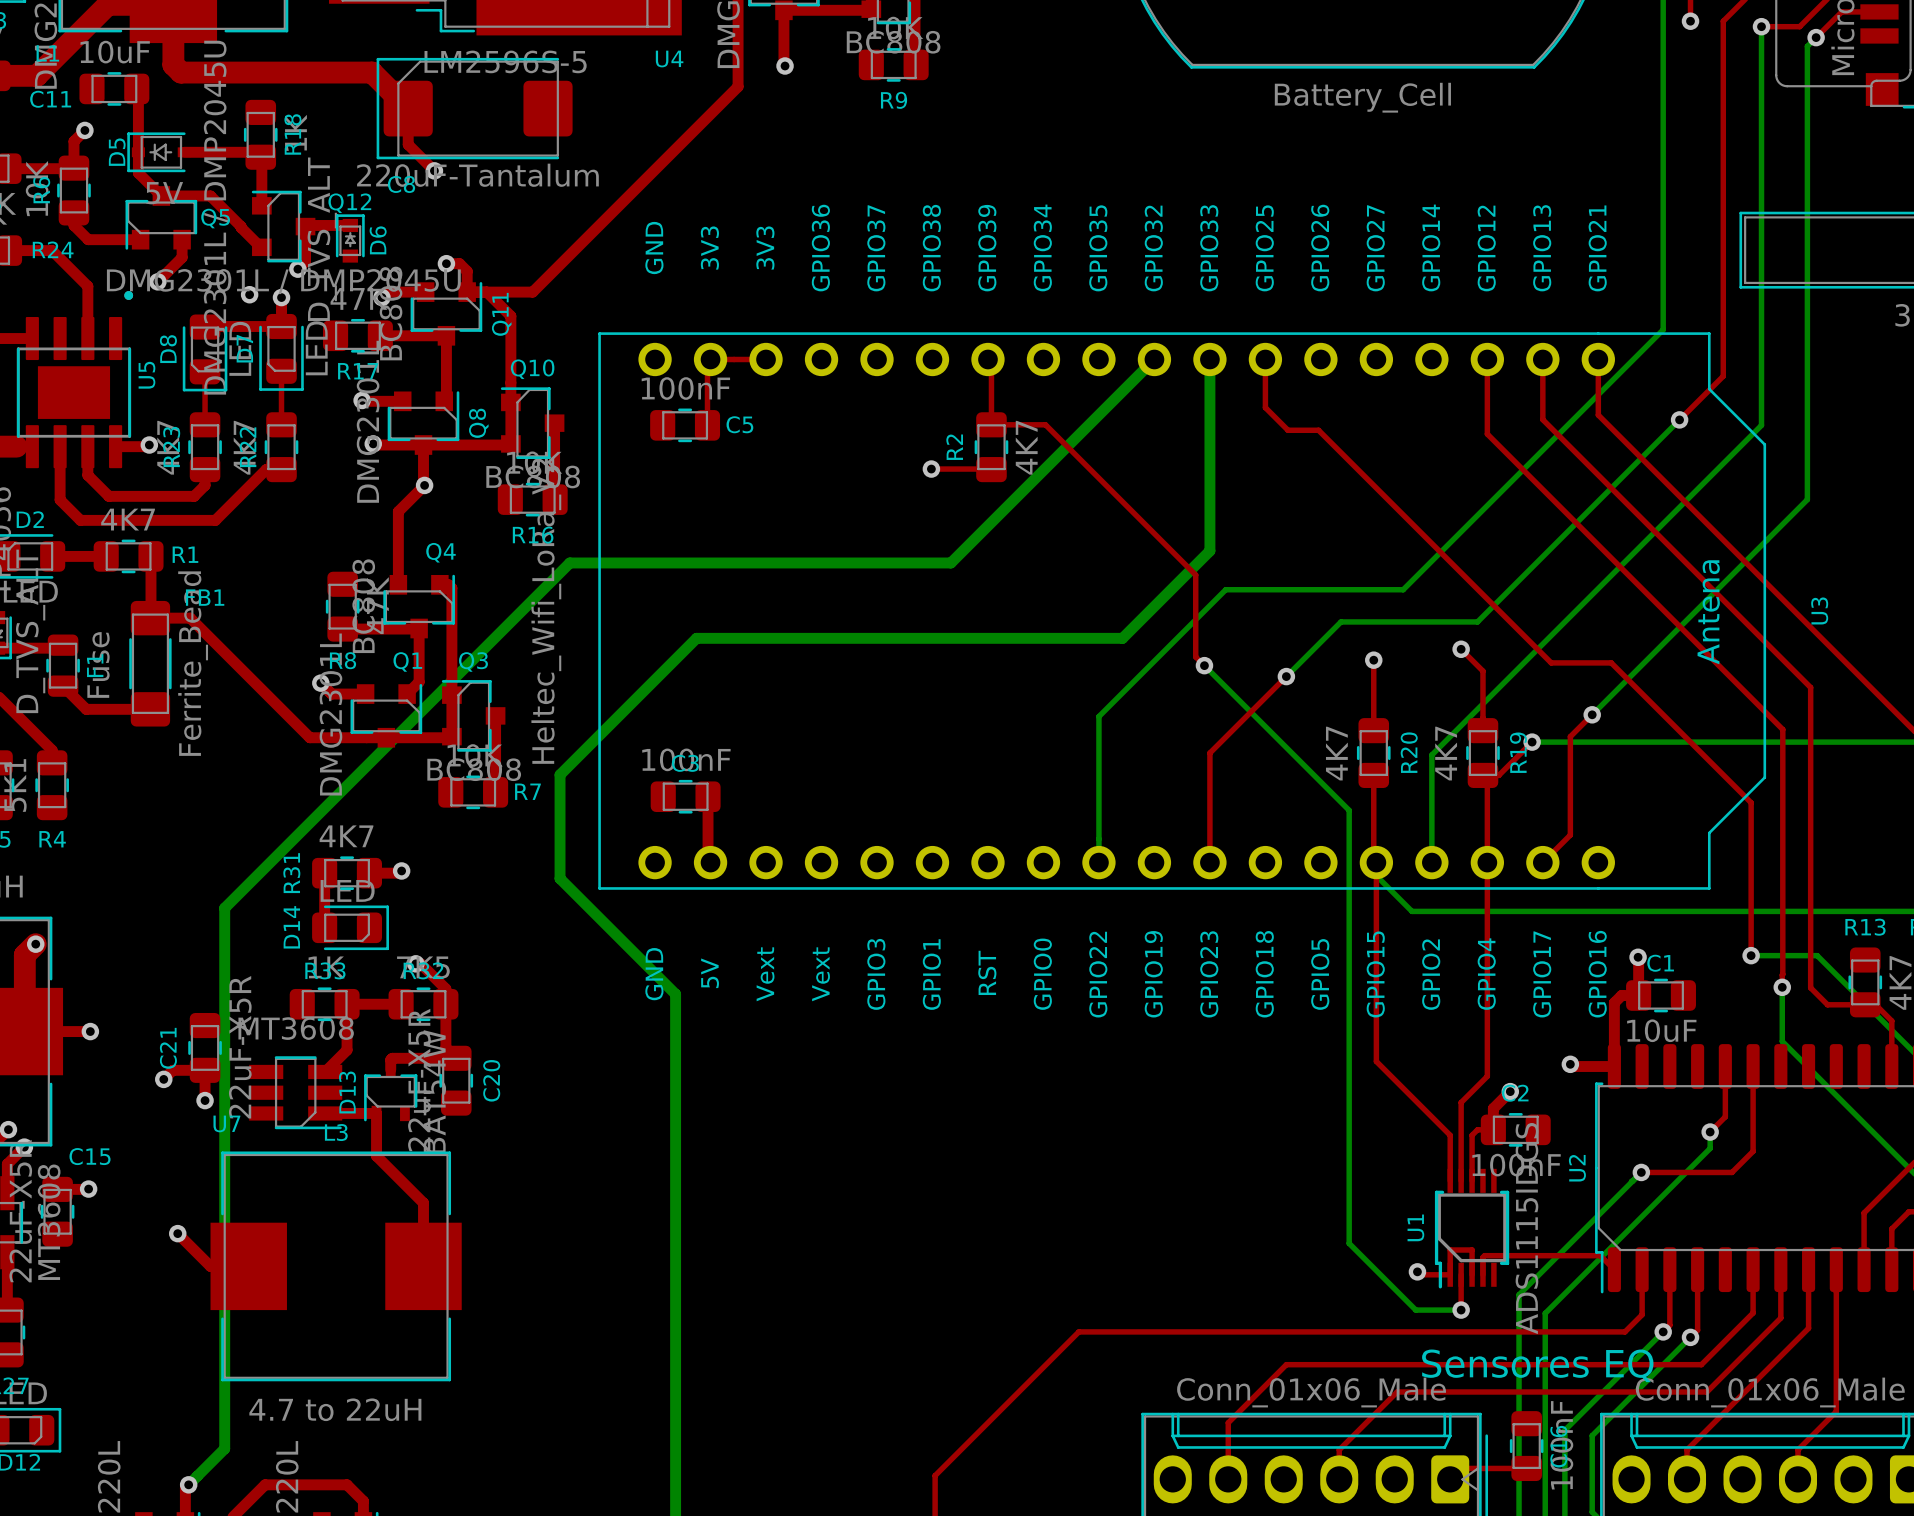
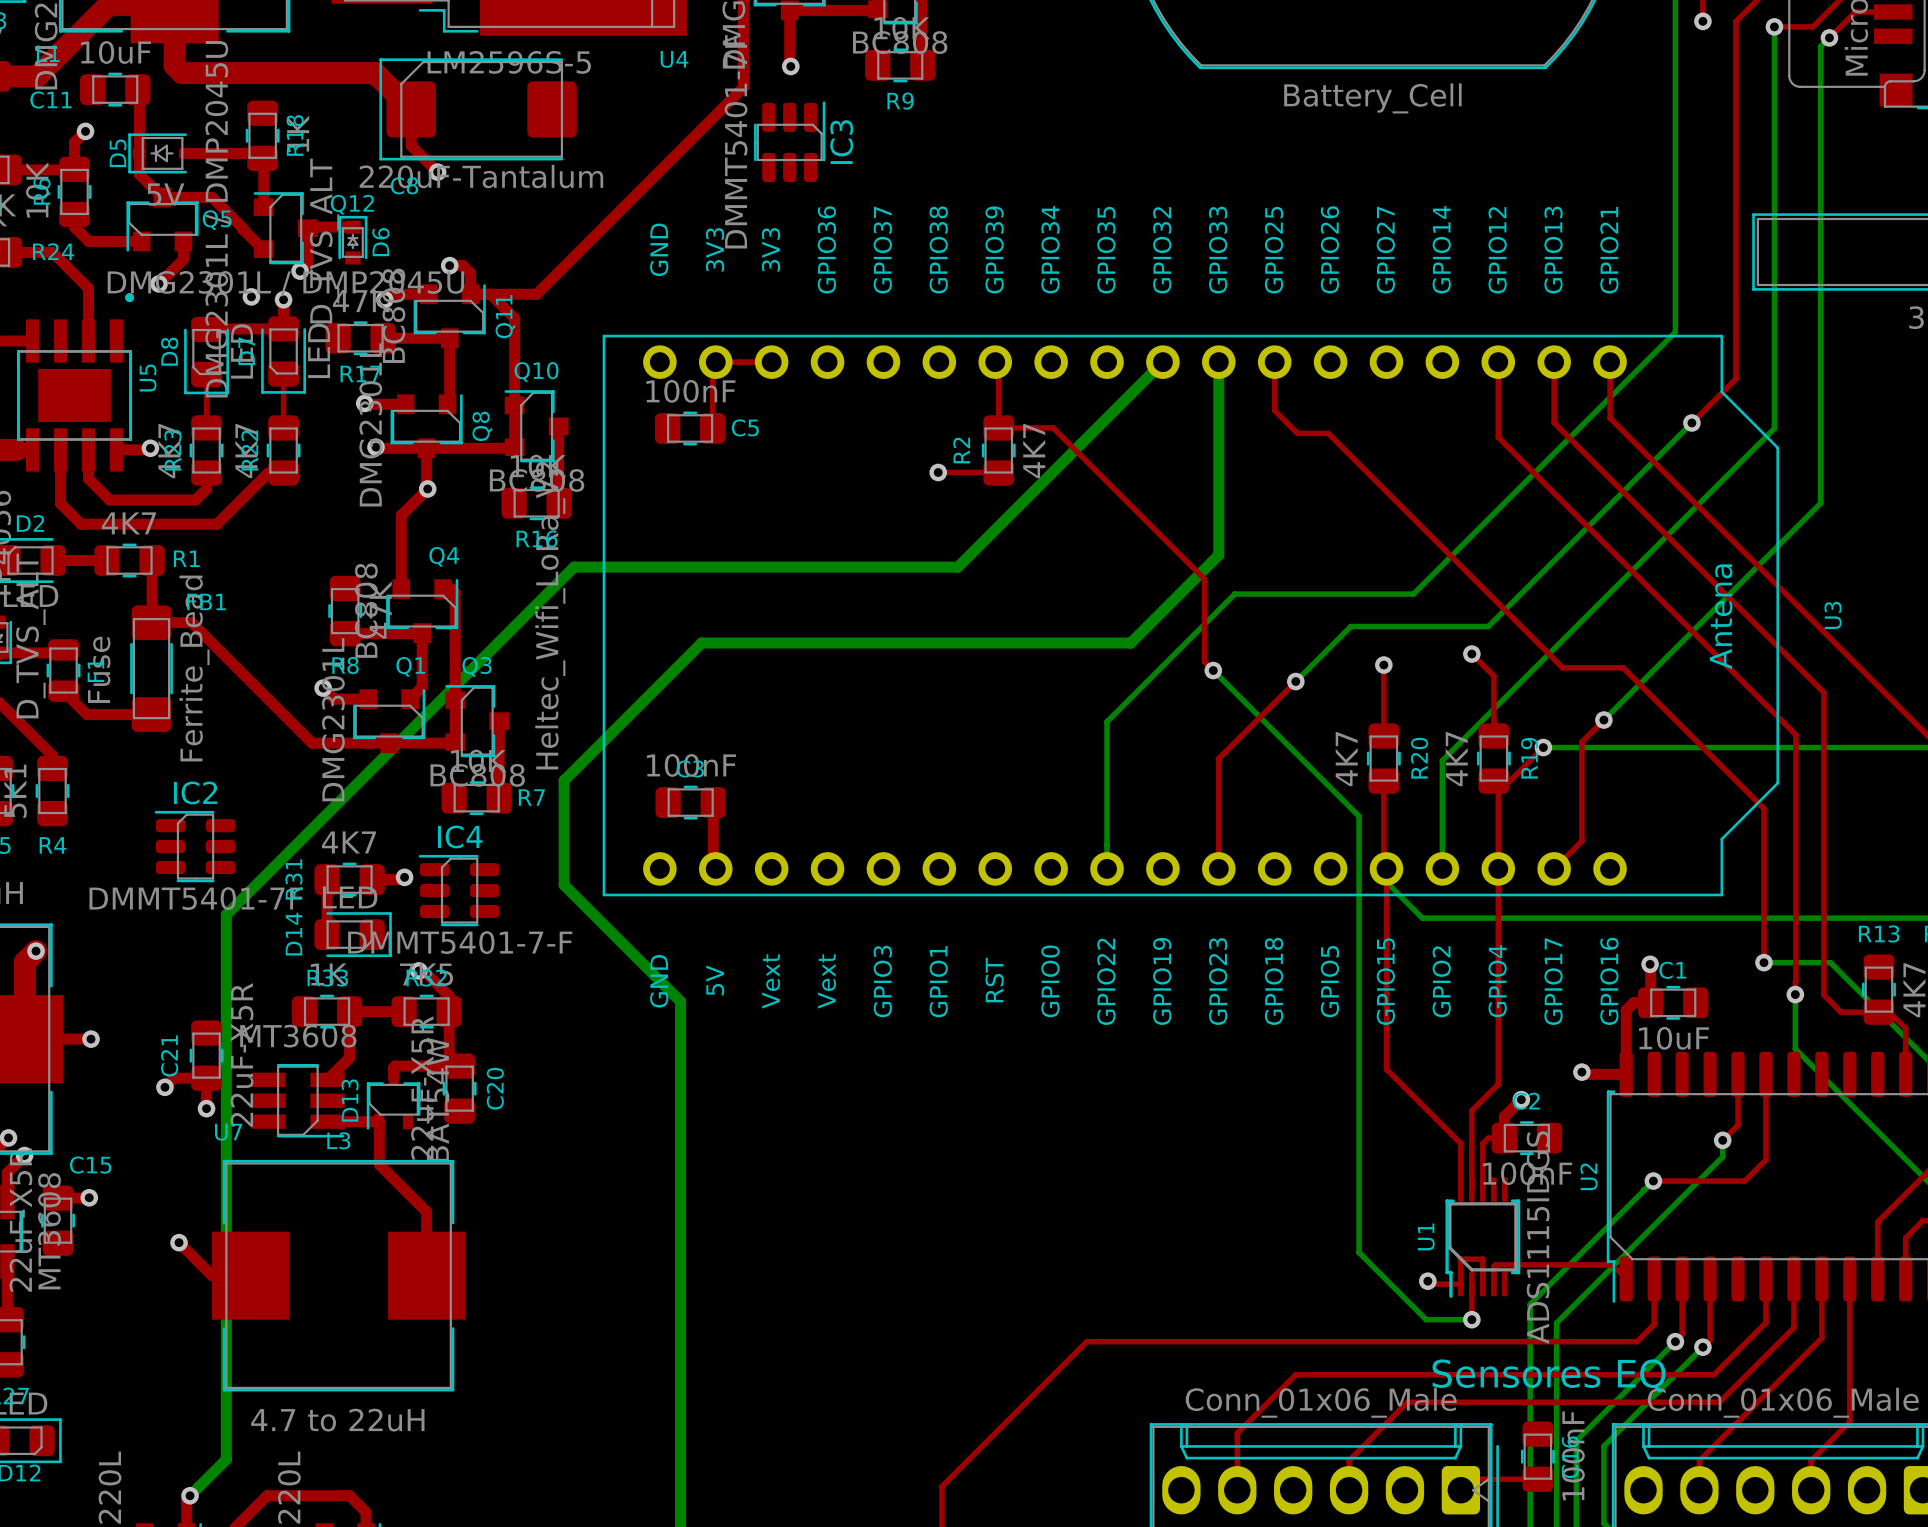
IC3: none -> DMMT5401-7F (789, 141)
IC2: none -> DMMT5401-7F (194, 846)
IC4: none -> DMMT5401-7-F (458, 890)

